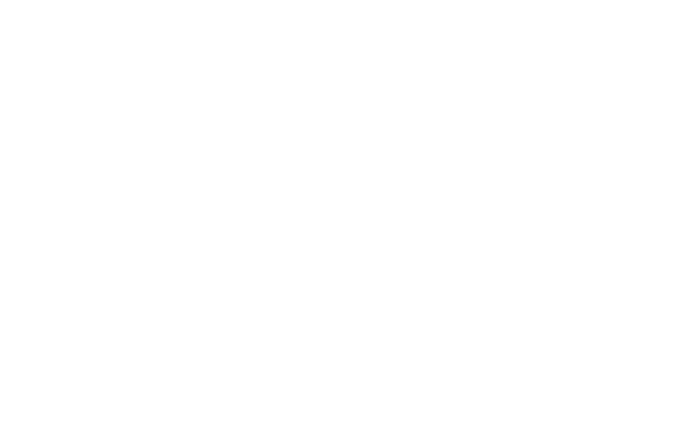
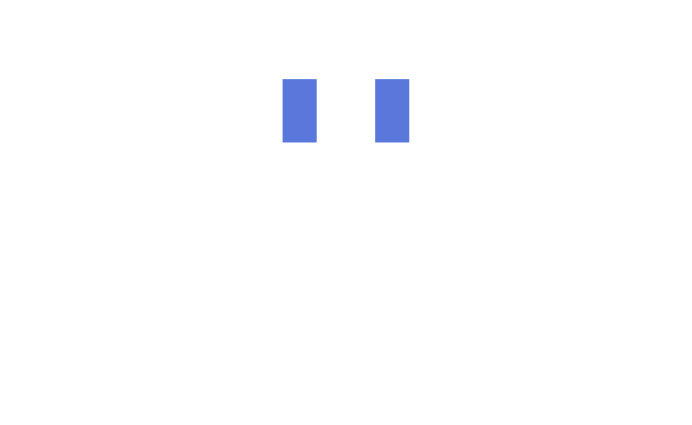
part: none -> (345, 110)

